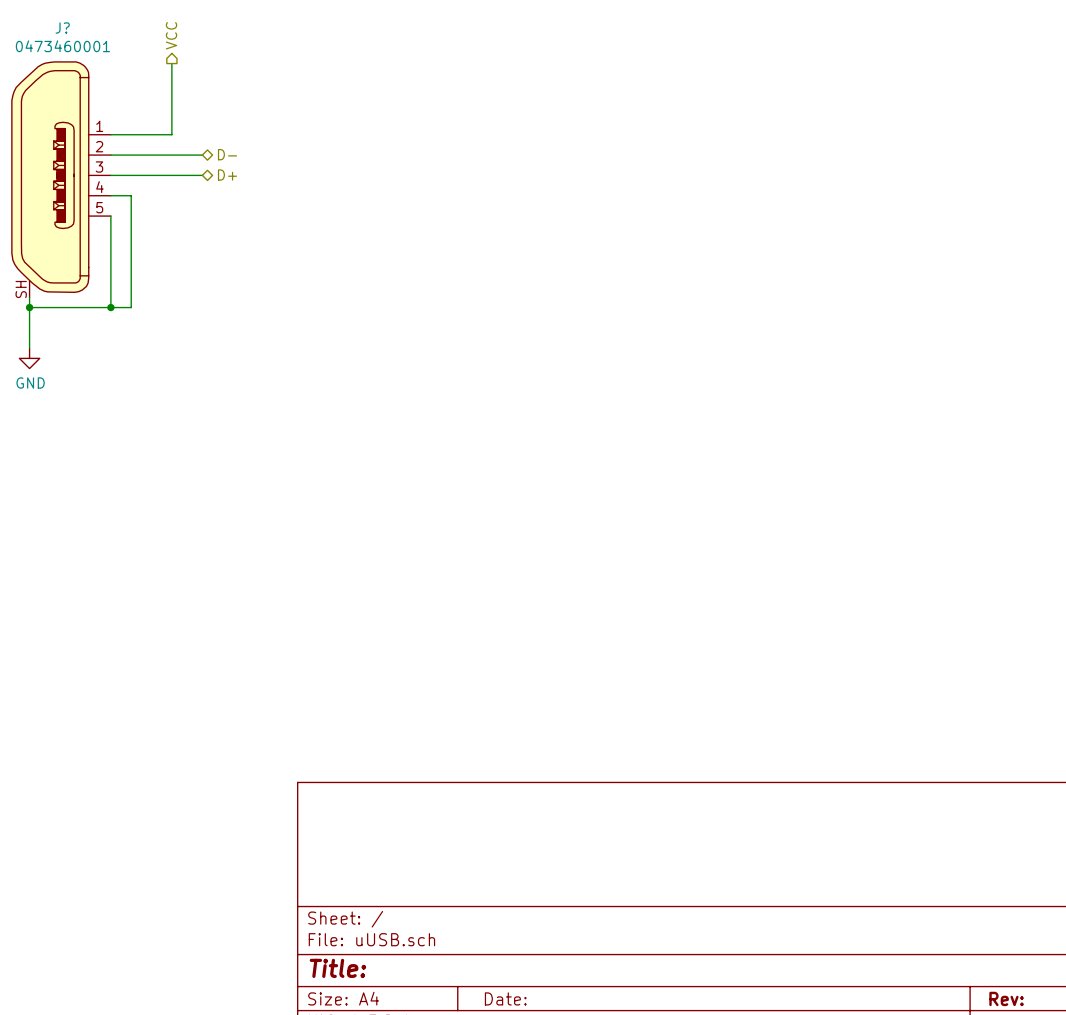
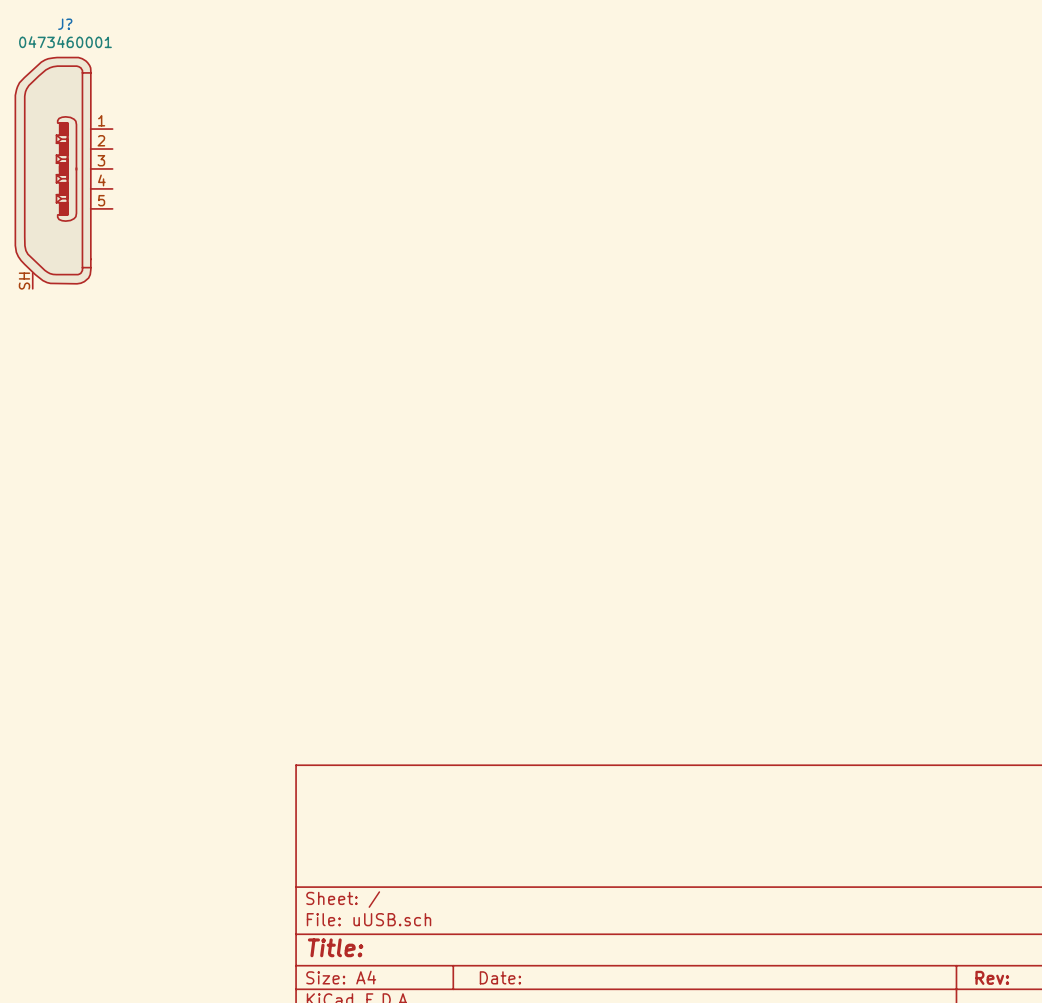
hierarchical label: VCC (171, 35) -> none
wire: (171, 63) (171, 134) (110, 134) -> none
hierarchical label: D- (227, 154) -> none
wire: (110, 155) (202, 155) -> none
wire: (110, 175) (202, 175) -> none
hierarchical label: D+ (227, 175) -> none
wire: (110, 195) (131, 195) (131, 307) (29, 307) -> none
wire: (110, 216) (110, 307) -> none
wire: (29, 297) (29, 348) -> none
junction: (29, 307) -> none
junction: (110, 307) -> none
power symbol: GND (29, 358) -> none

